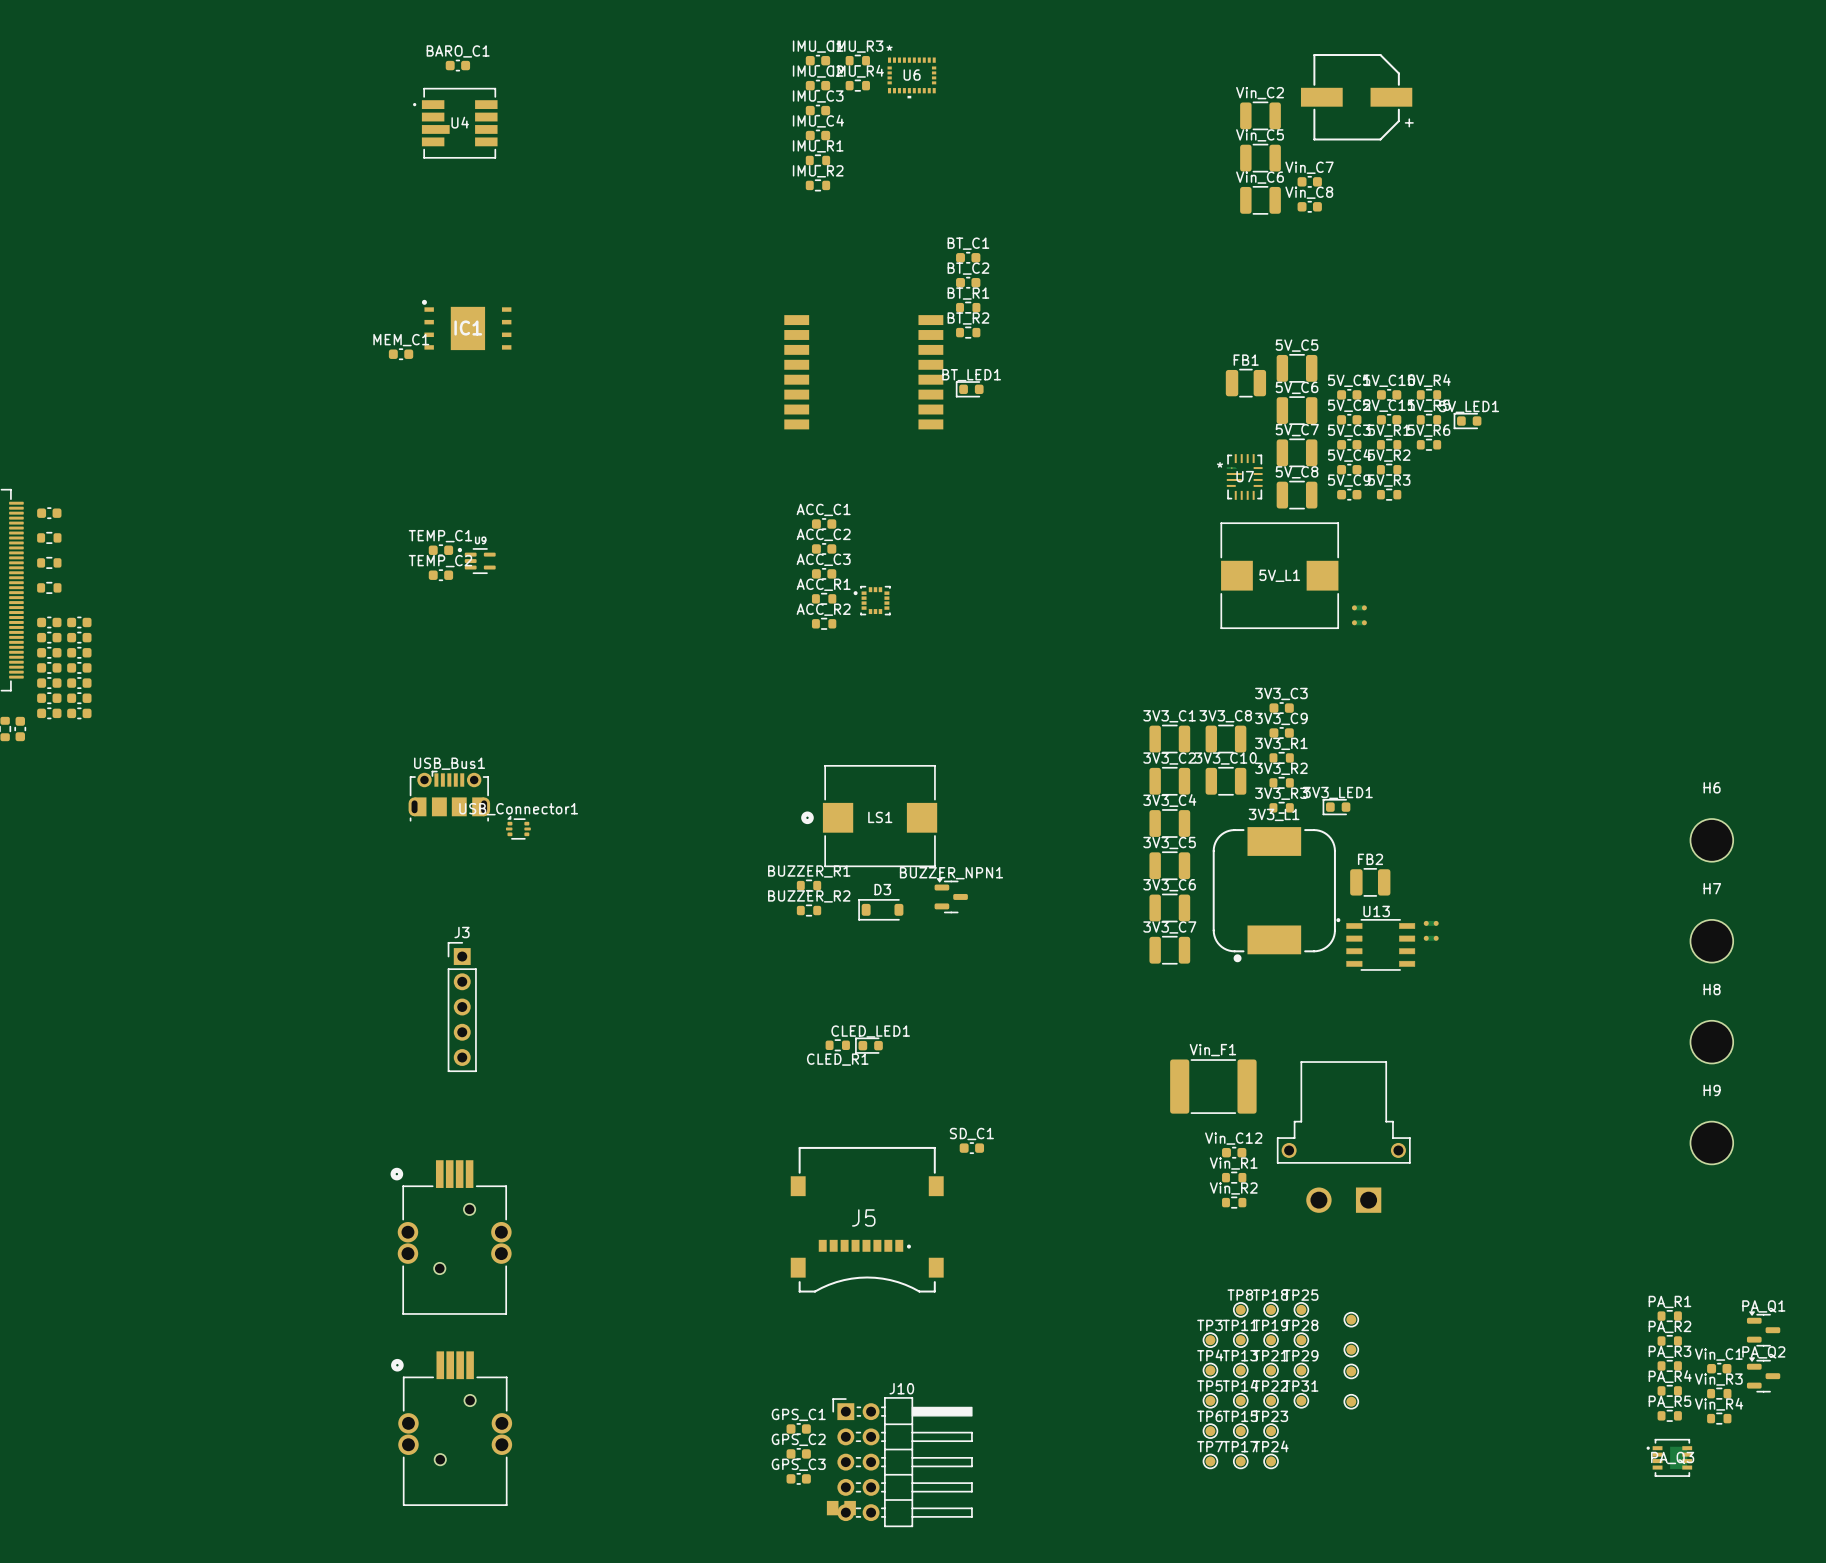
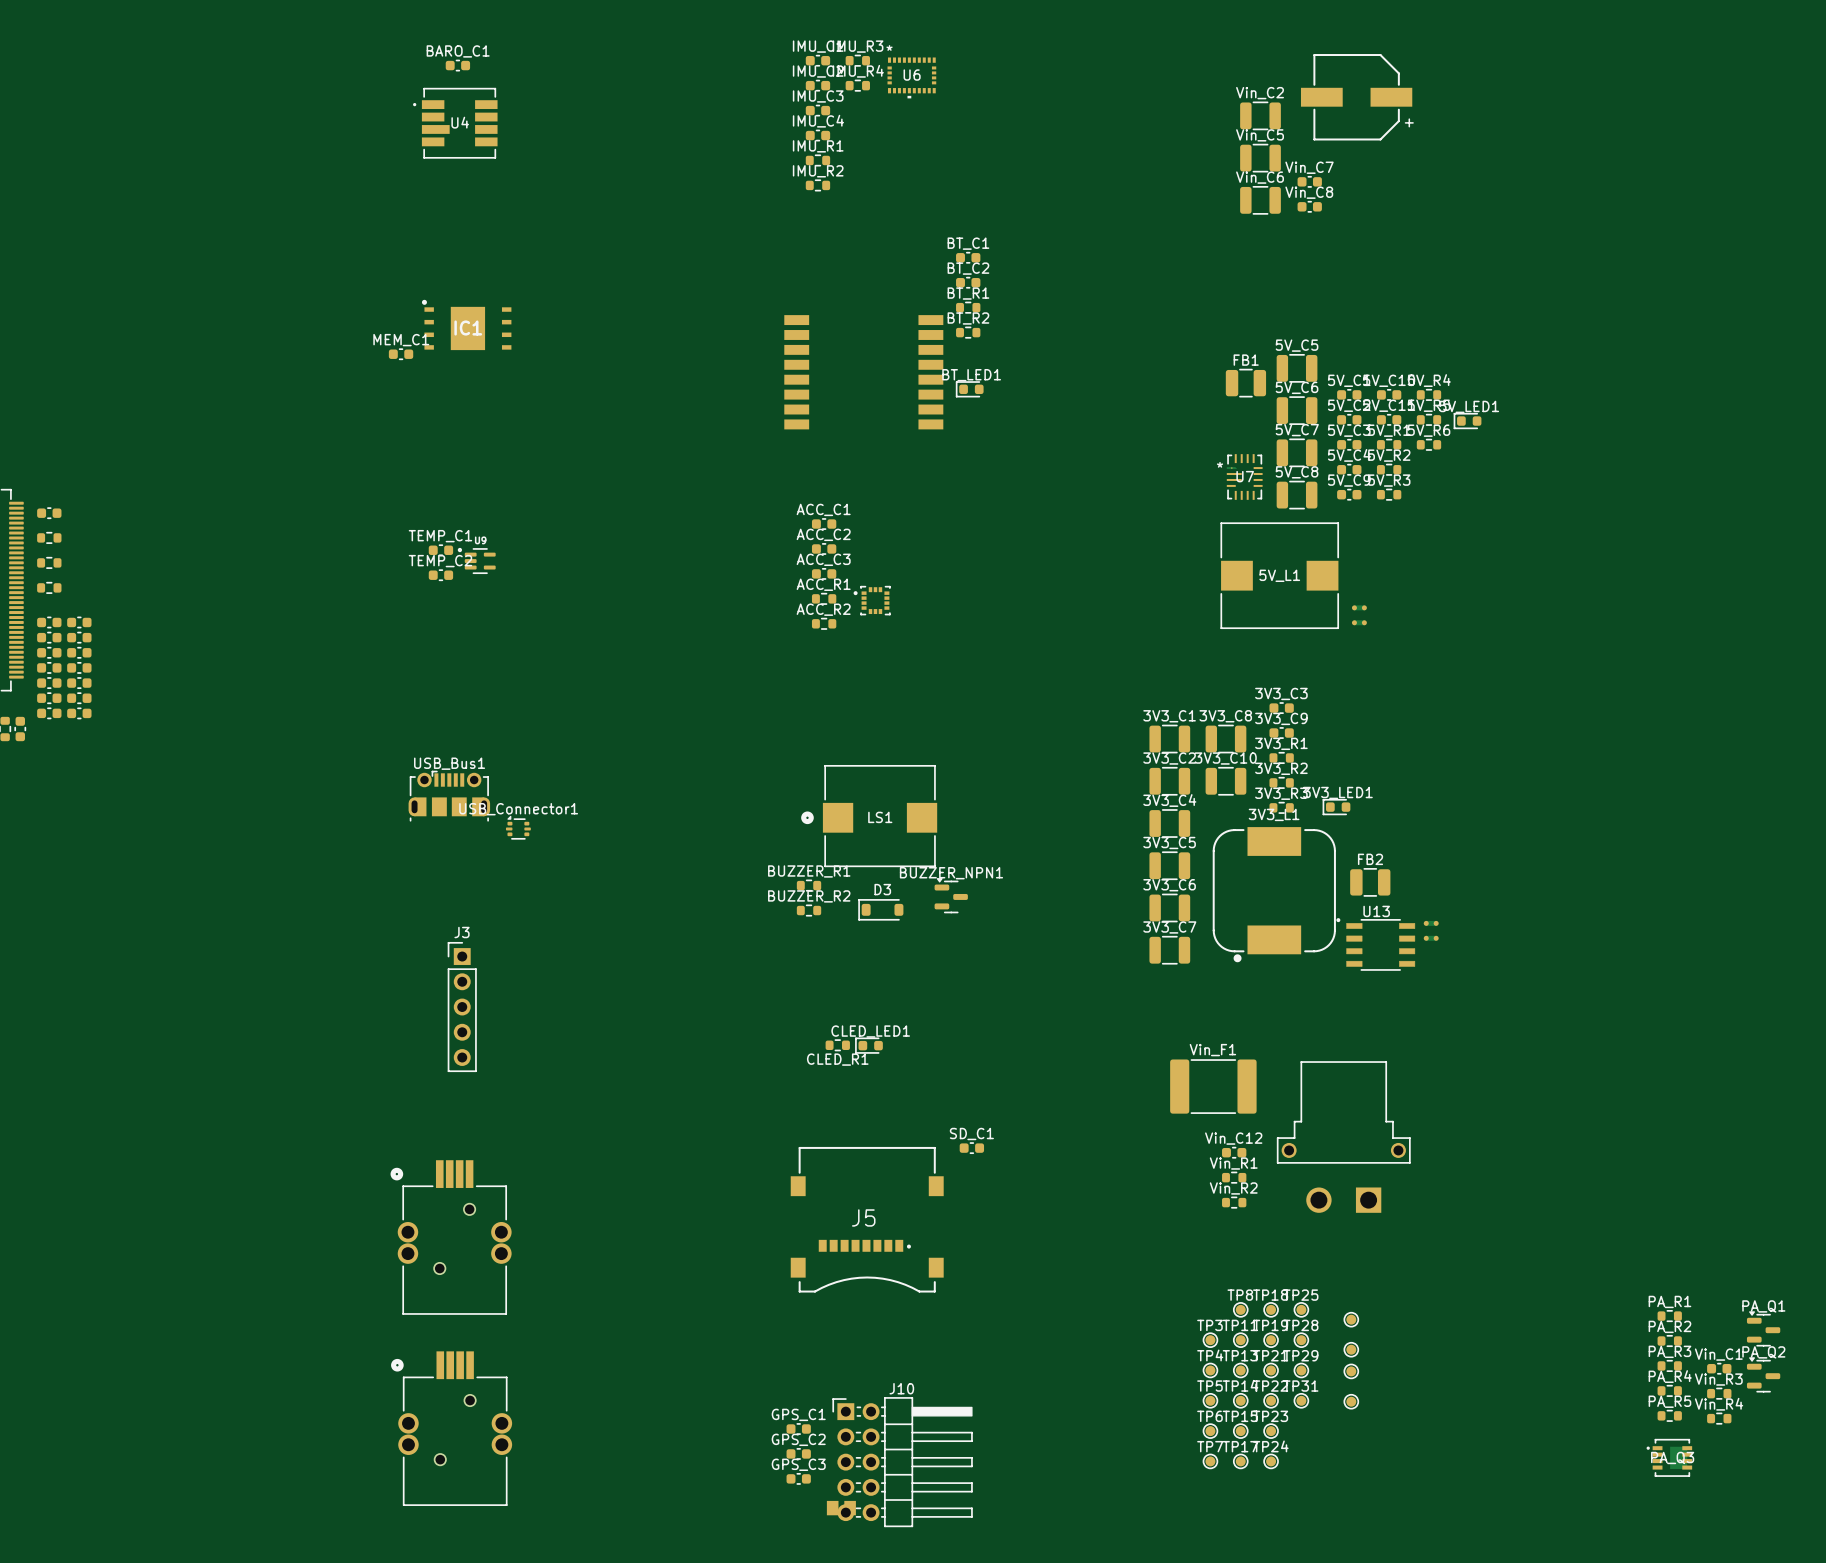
H6: (1711, 840) -> none
H7: (1711, 941) -> none
H8: (1711, 1042) -> none
H9: (1711, 1143) -> none

